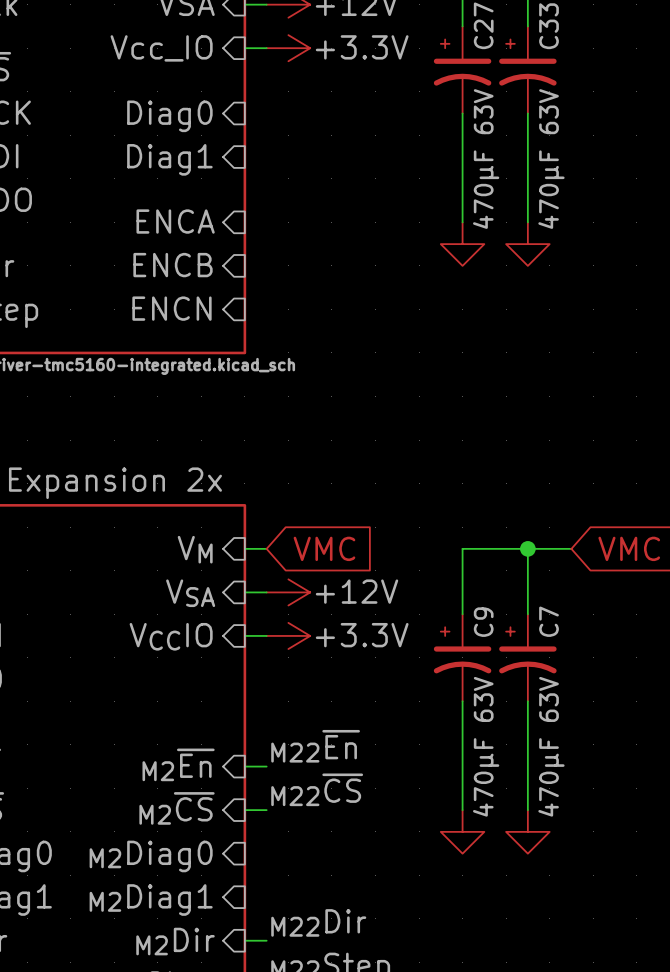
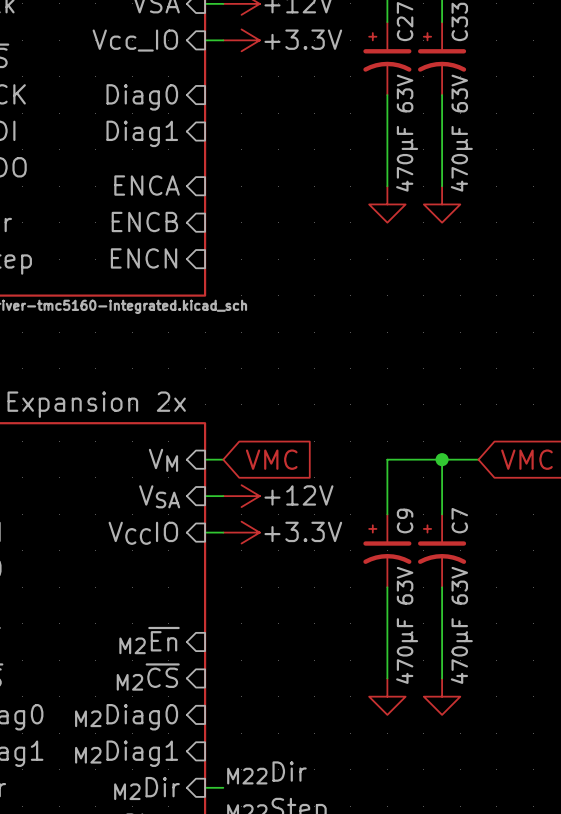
label: M22~{En} (315, 746) -> none
wire: (244, 766) (266, 766) -> none
label: M22~{CS} (317, 789) -> none
wire: (244, 810) (266, 810) -> none

